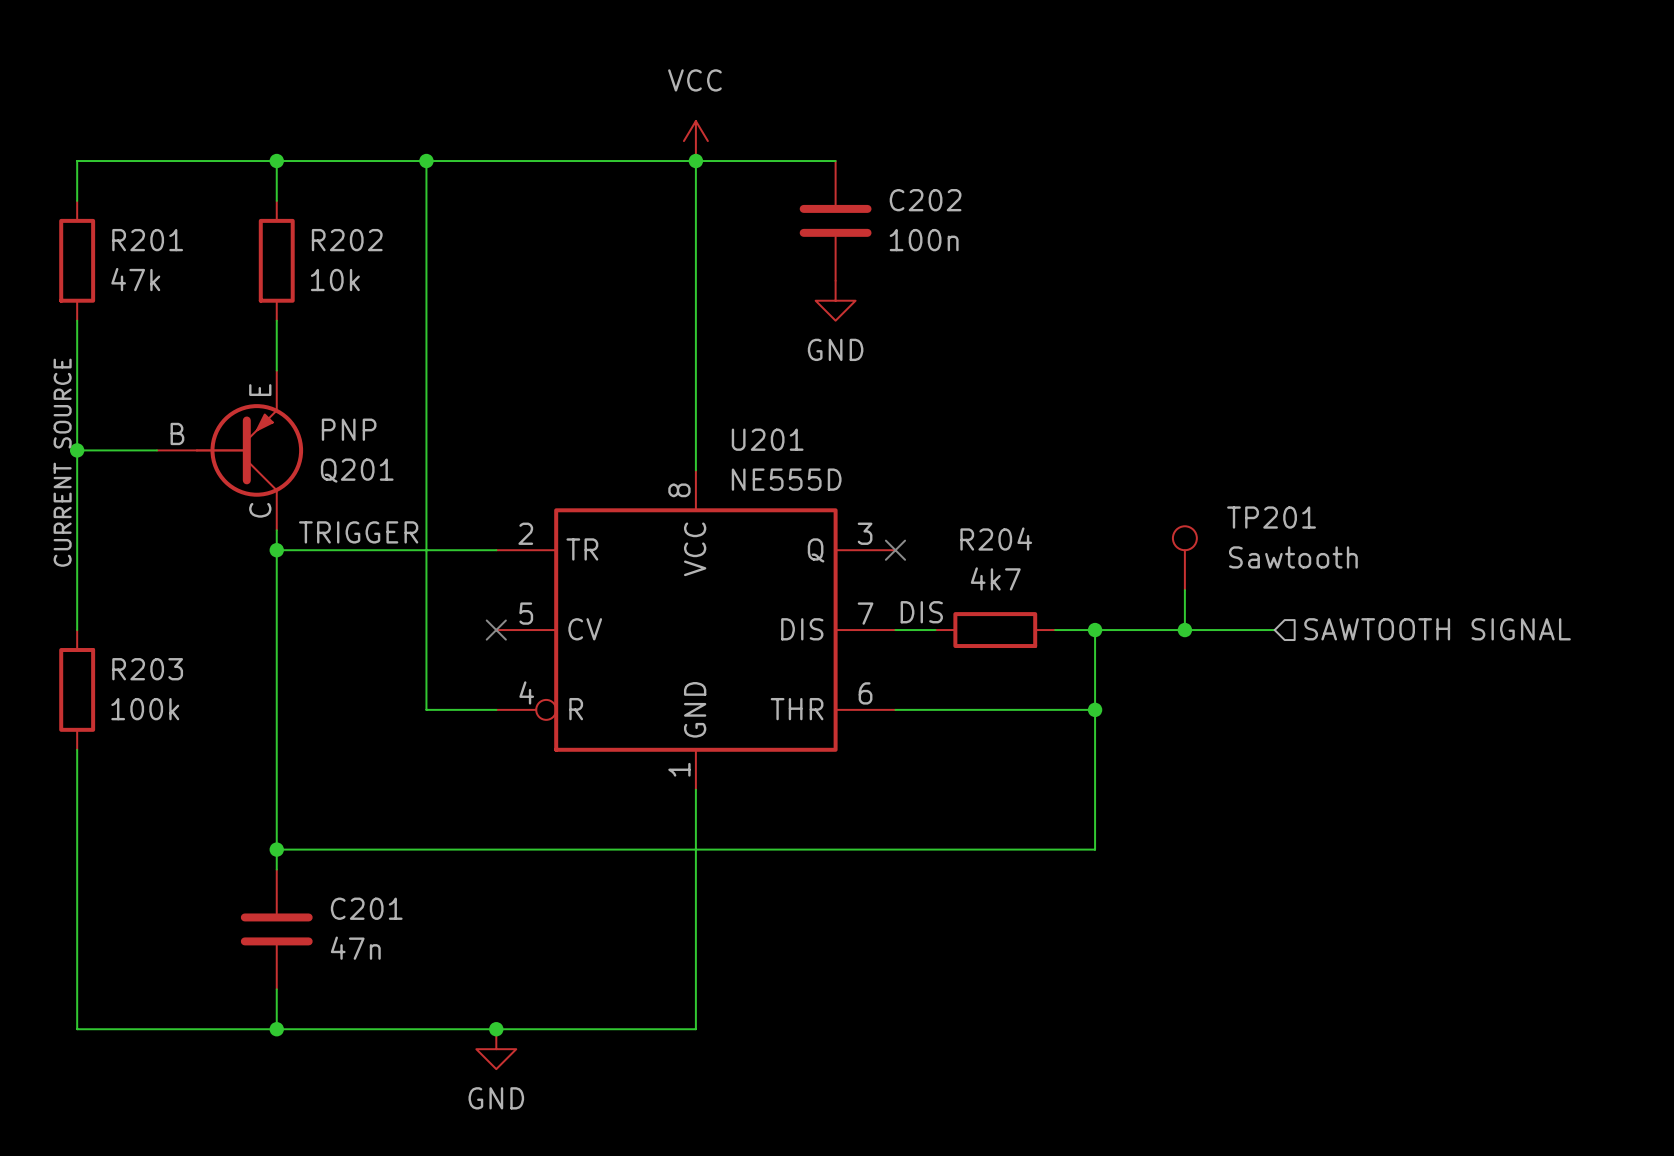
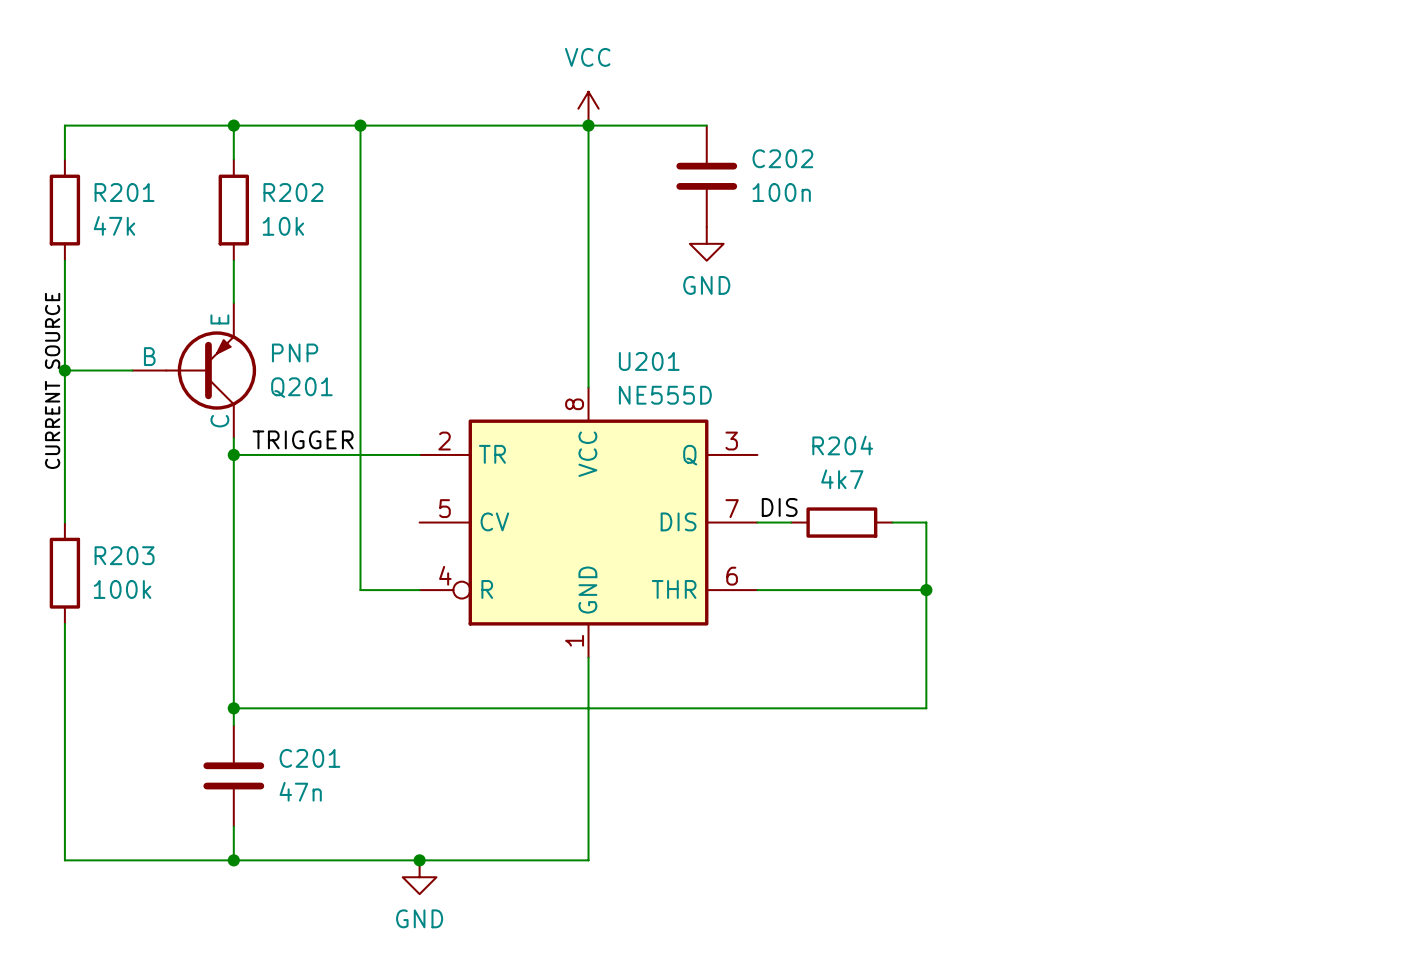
no-connect mark: (895, 550) -> none
TP201: Sawtooth (1184, 558) -> none
wire: (1184, 590) (1184, 630) -> none
hierarchical label: SAWTOOTH SIGNAL (1437, 629) -> none
no-connect mark: (496, 630) -> none
wire: (1095, 630) (1274, 630) -> none
junction: (1095, 630) -> none
junction: (1184, 630) -> none

